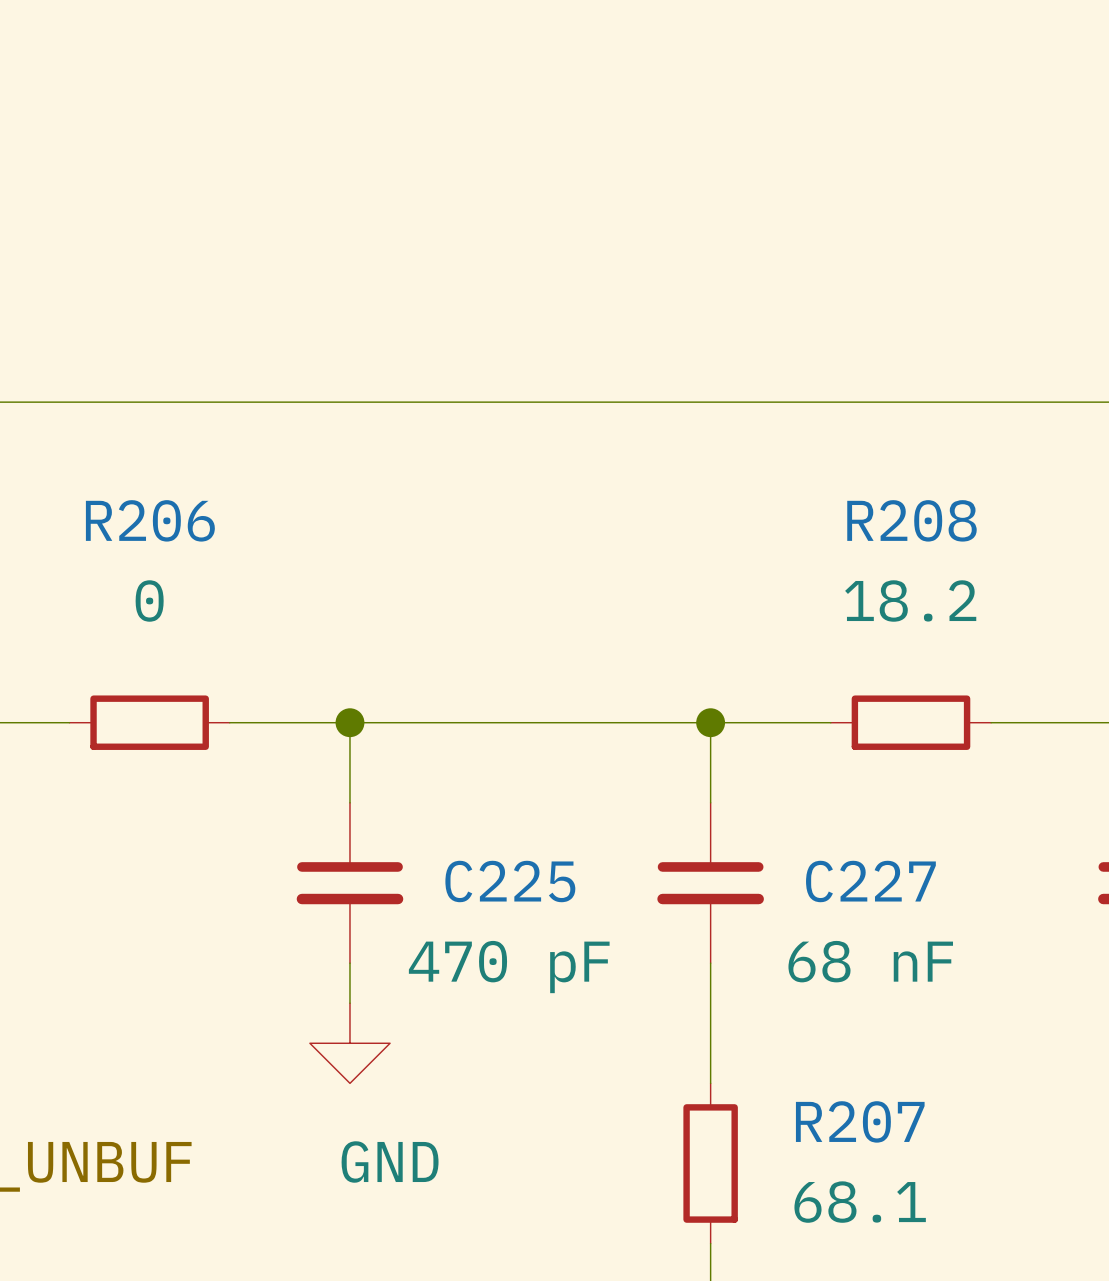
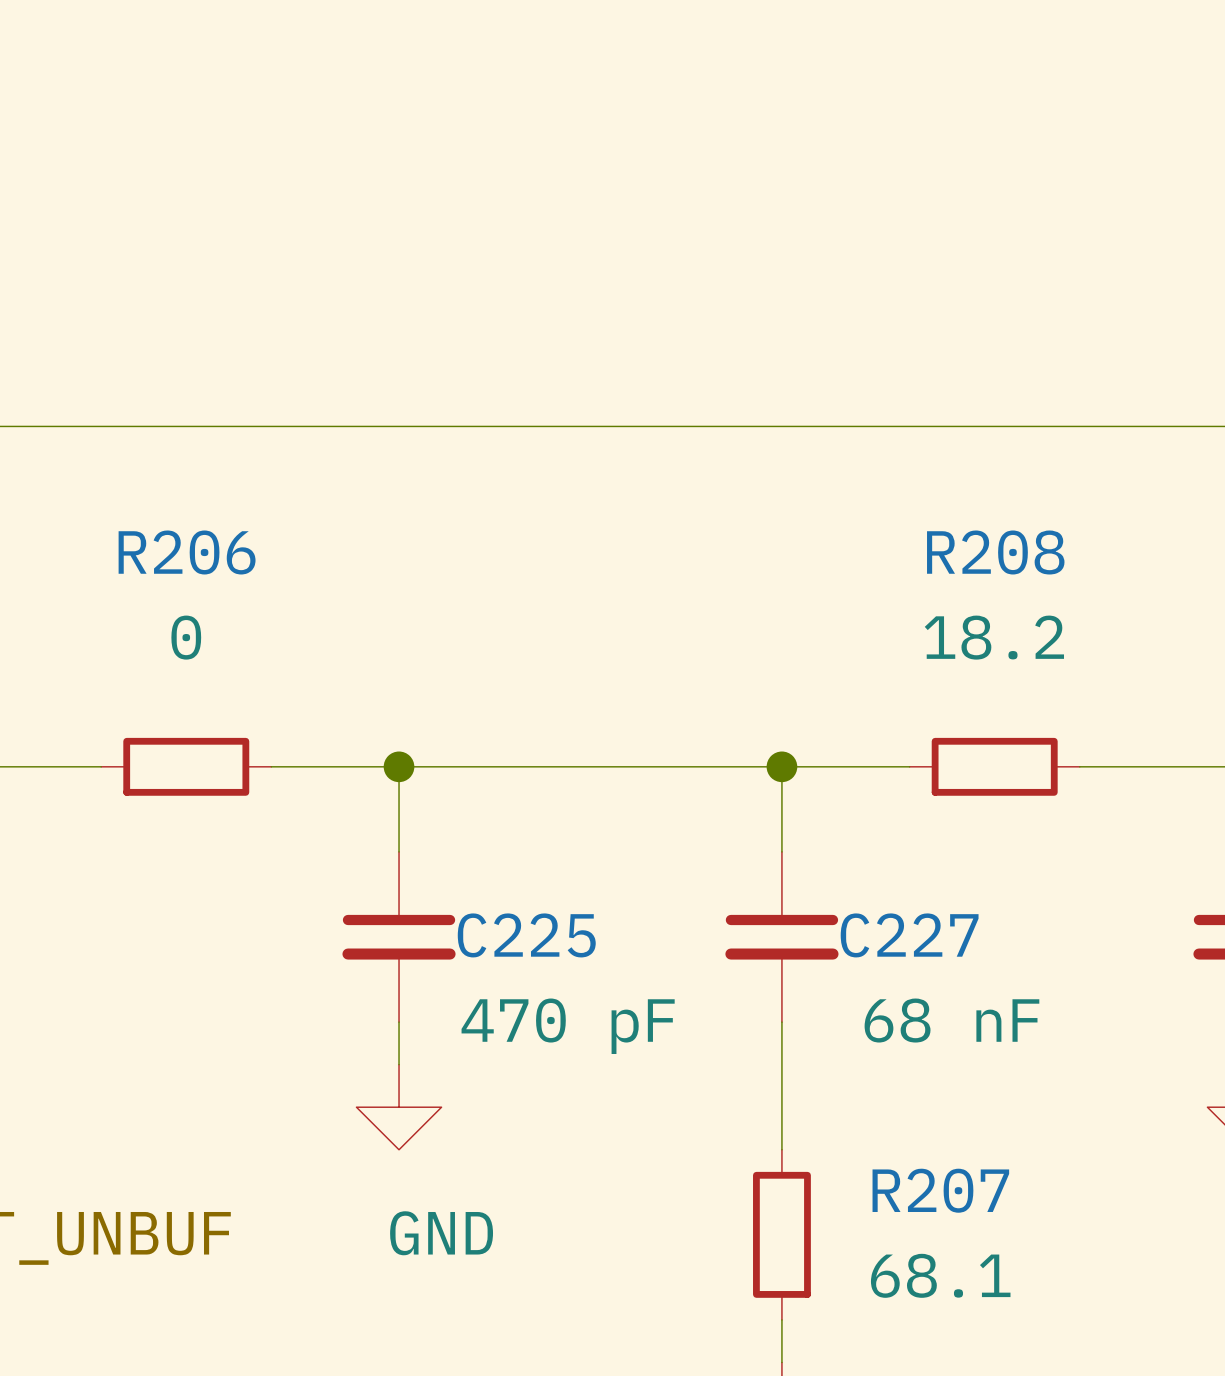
C225 name position: C225 (510, 881) -> C225 (526, 935)
C227 name position: C227 (870, 881) -> C227 (909, 935)

